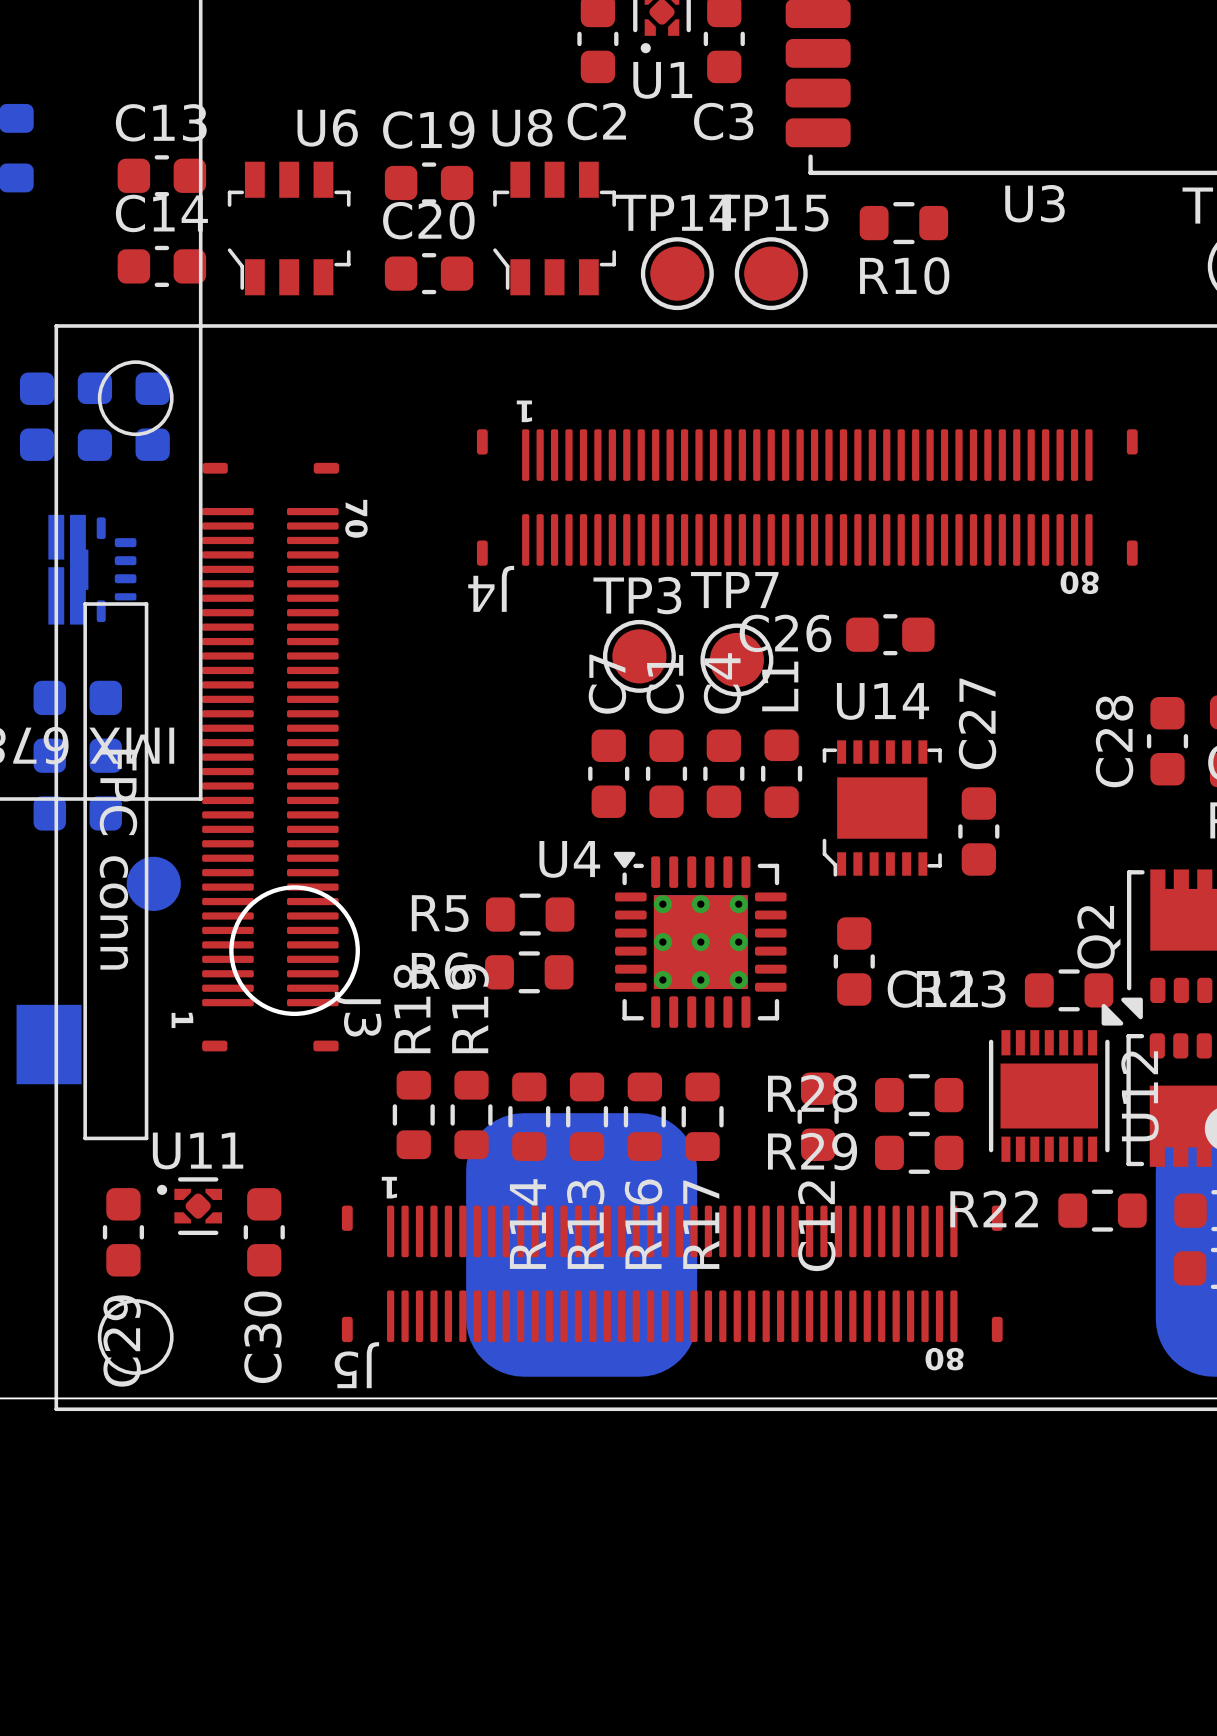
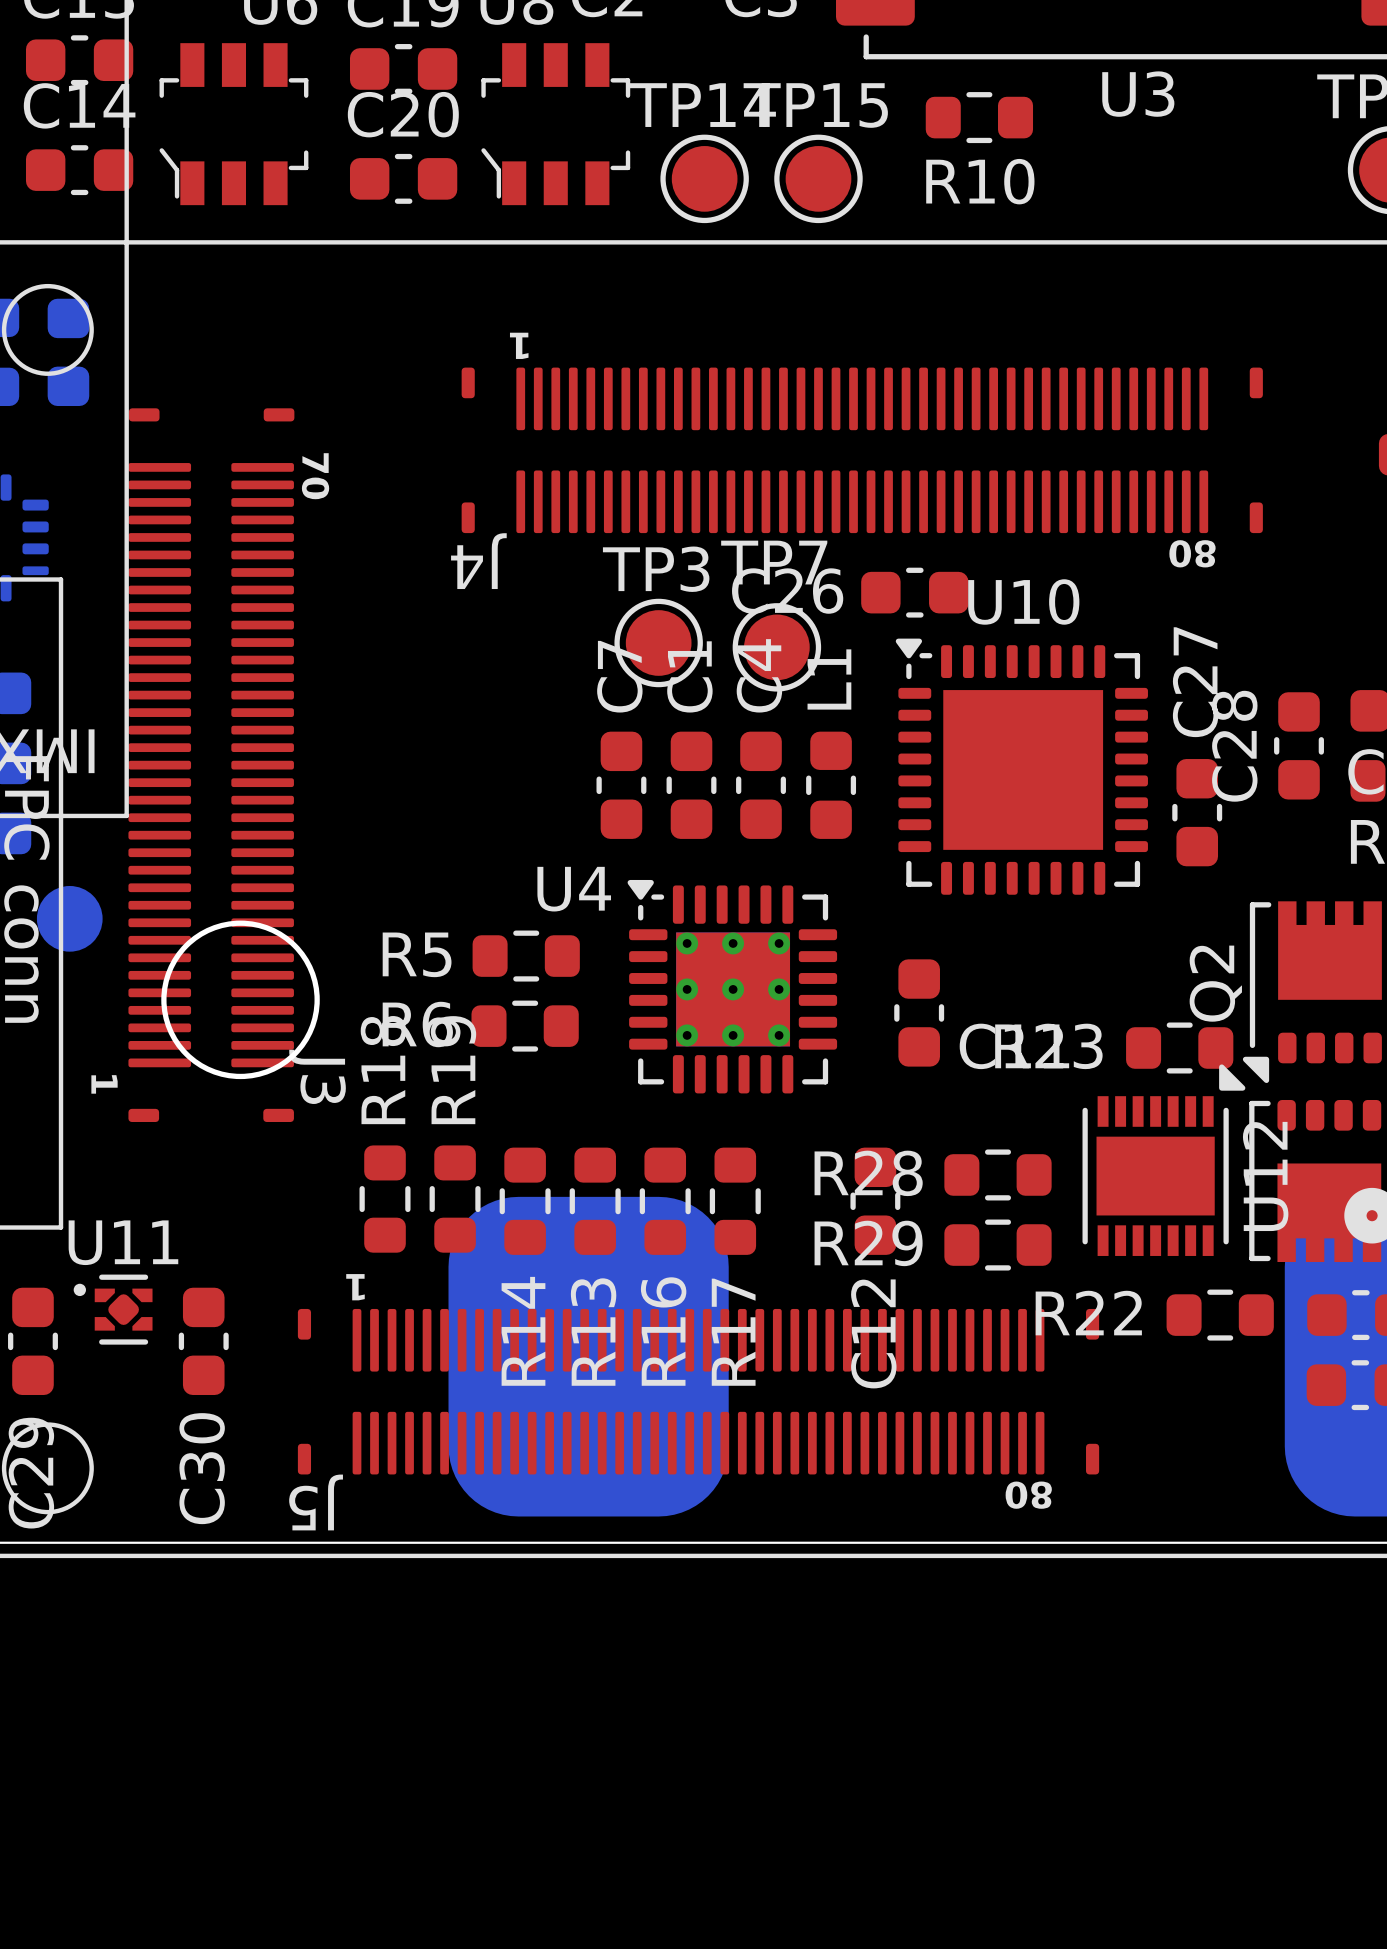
C26 position: (890, 634) -> (914, 592)
U10: none -> (1021, 766)
U14: (882, 808) -> none
C27 position: (978, 831) -> (1197, 812)

